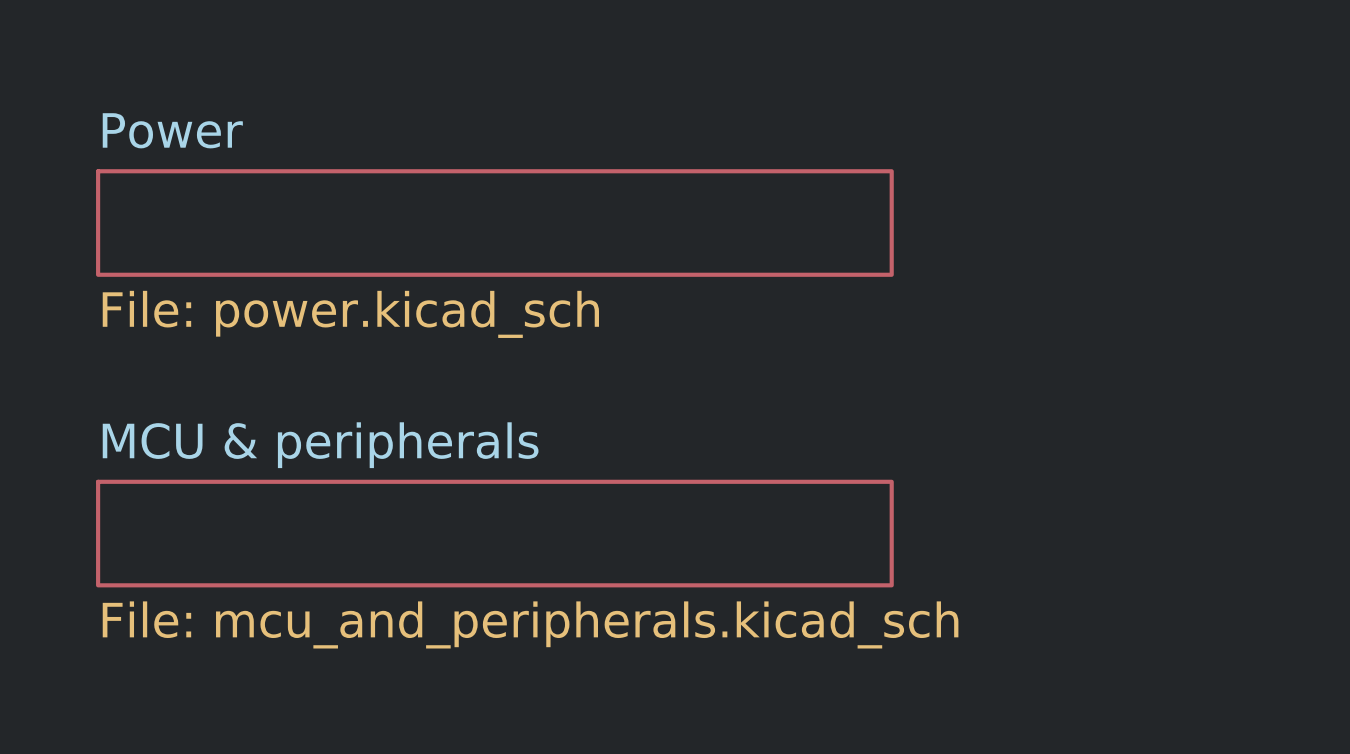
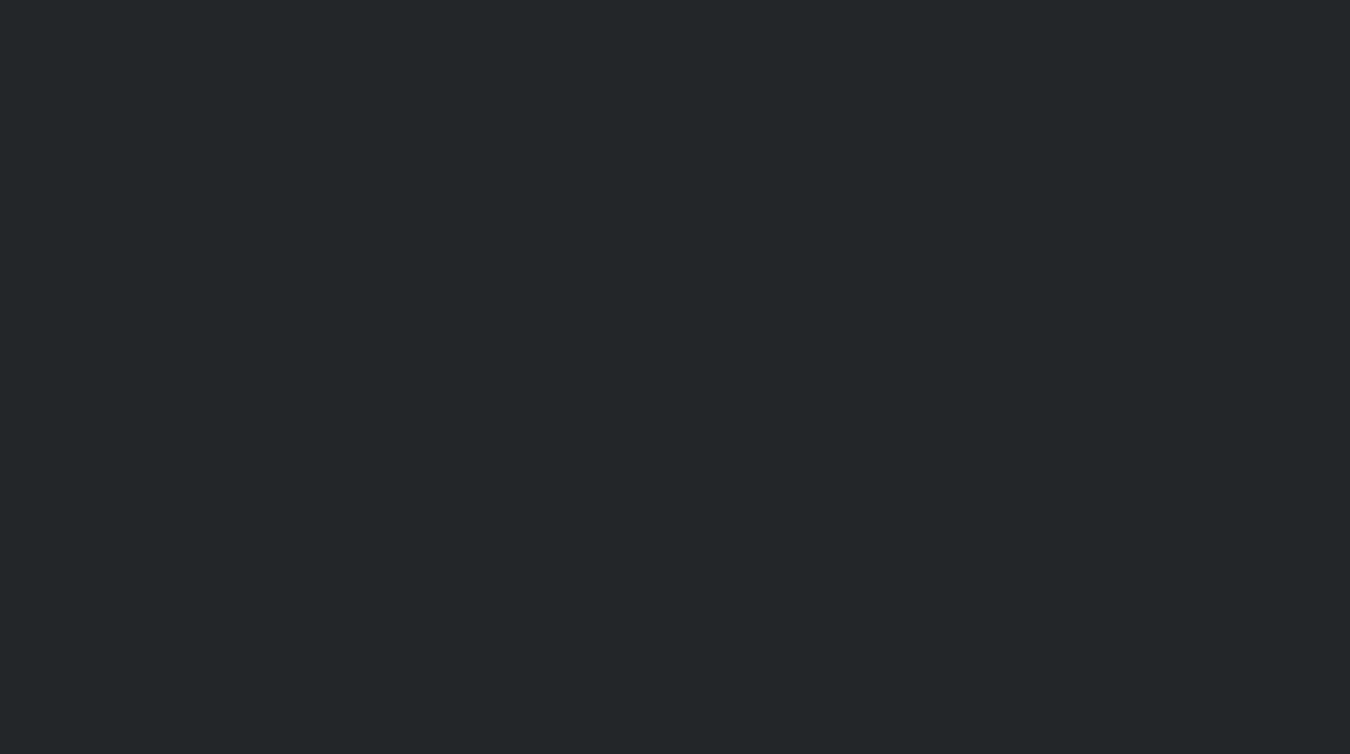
sheet Power: File: power.kicad_sch (494, 223) -> none
sheet MCU & peripherals: File: mcu_and_peripherals.kicad_sch (494, 533) -> none

